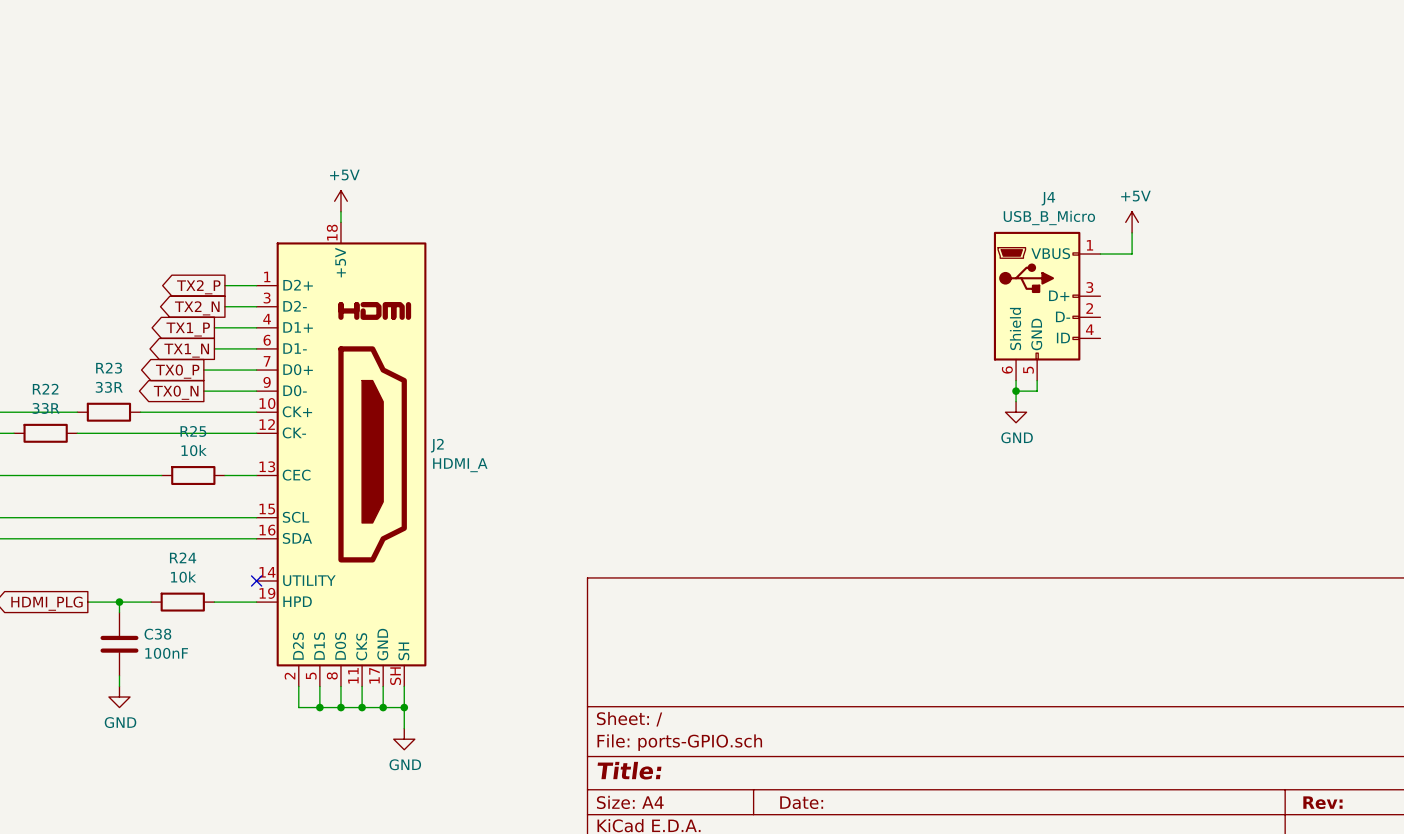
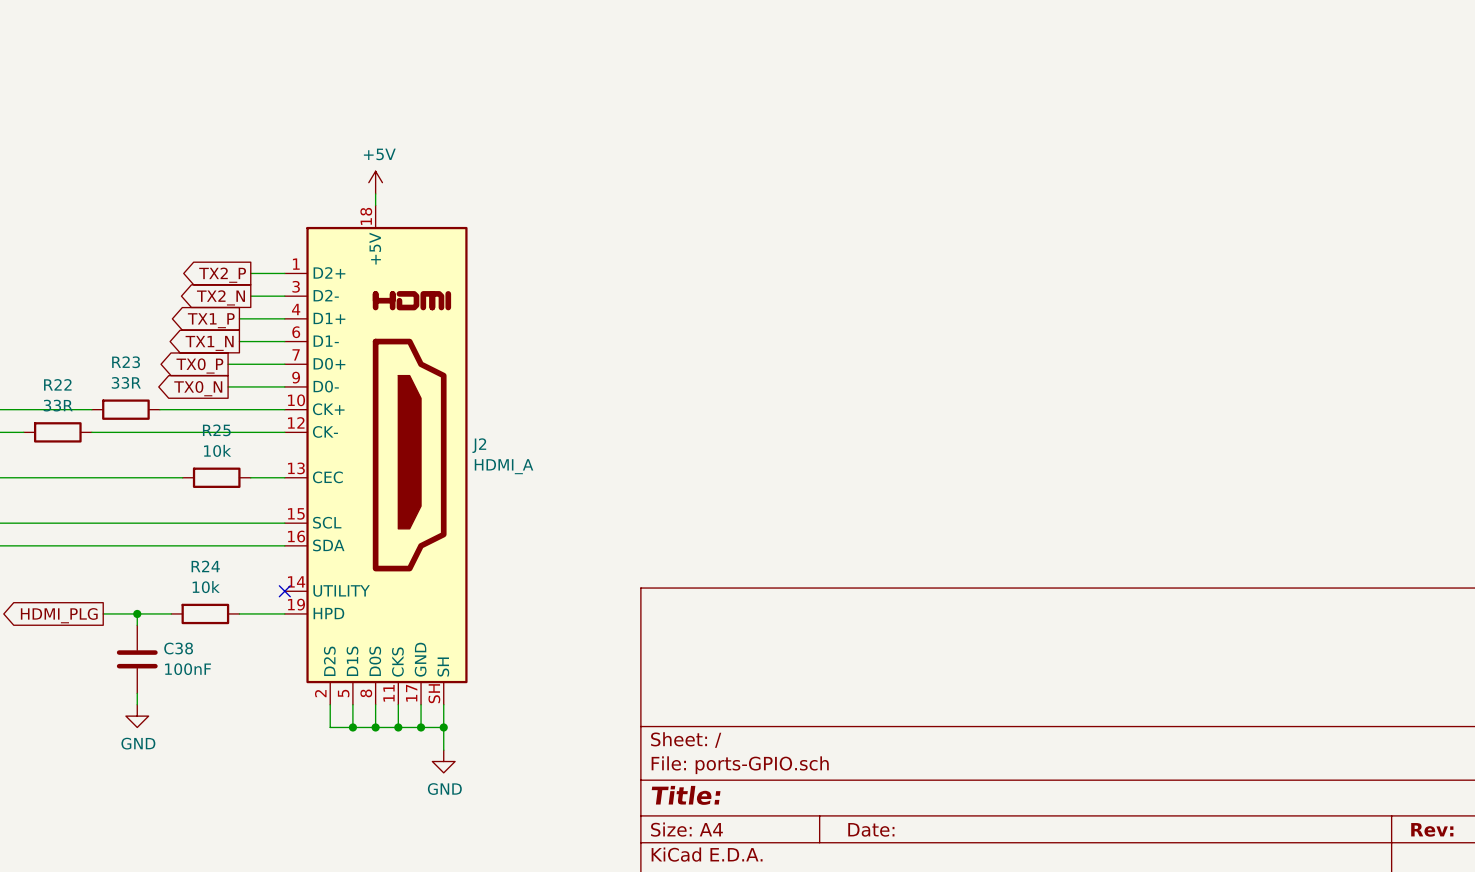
power symbol: +5V (1132, 222) -> none
wire: (1132, 232) (1132, 254) (1100, 254) -> none
J4: USB_B_Micro (1047, 306) -> none
wire: (1016, 380) (1016, 401) -> none
wire: (1037, 380) (1037, 391) (1016, 391) -> none
junction: (1016, 391) -> none
power symbol: GND (1016, 412) -> none

